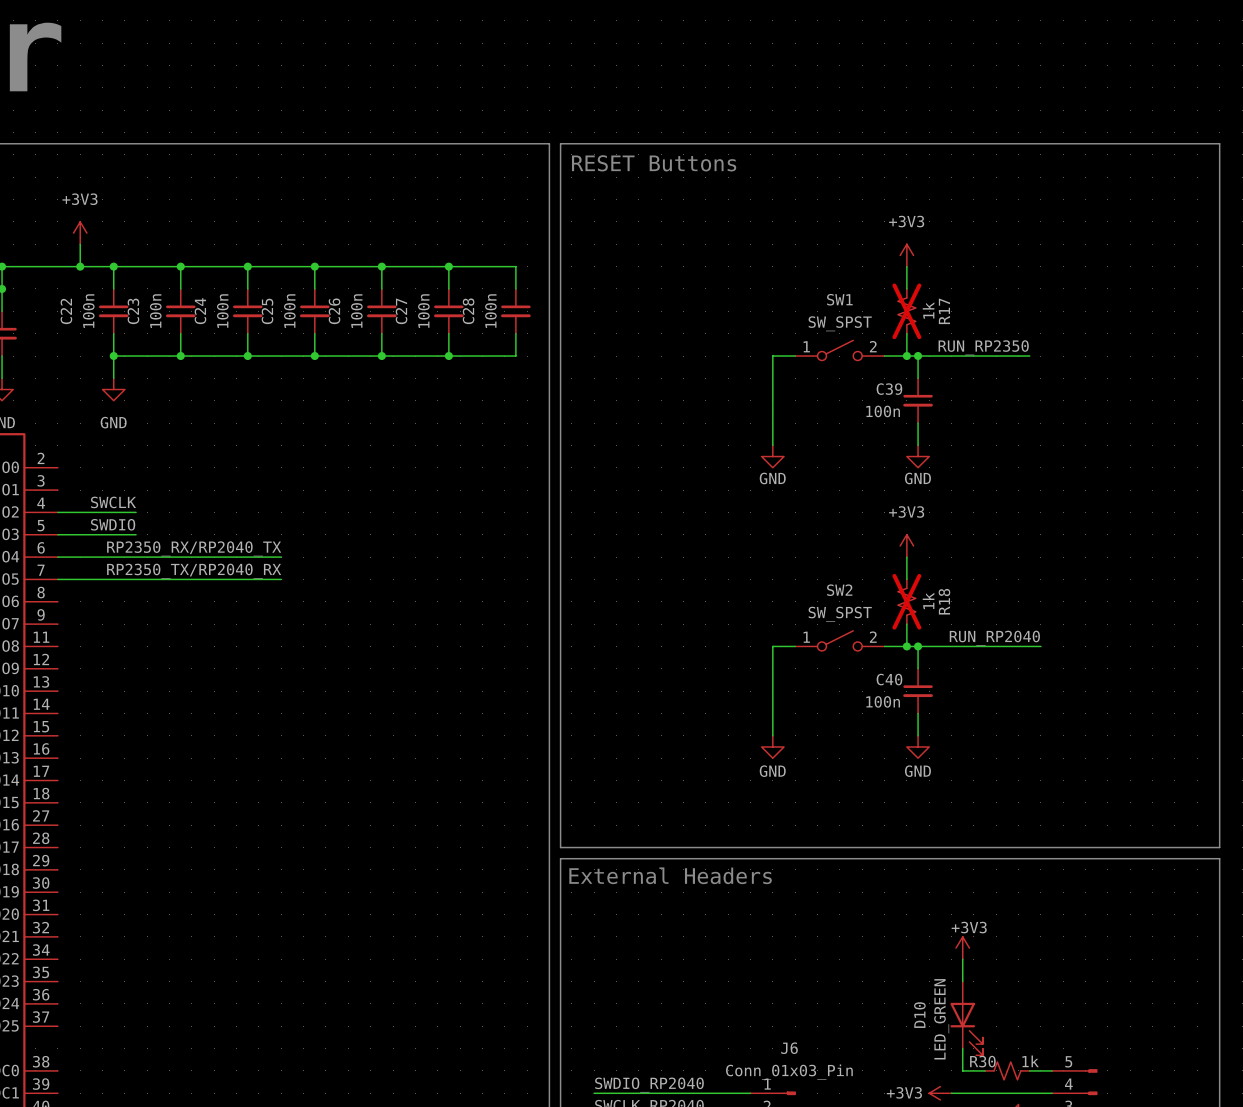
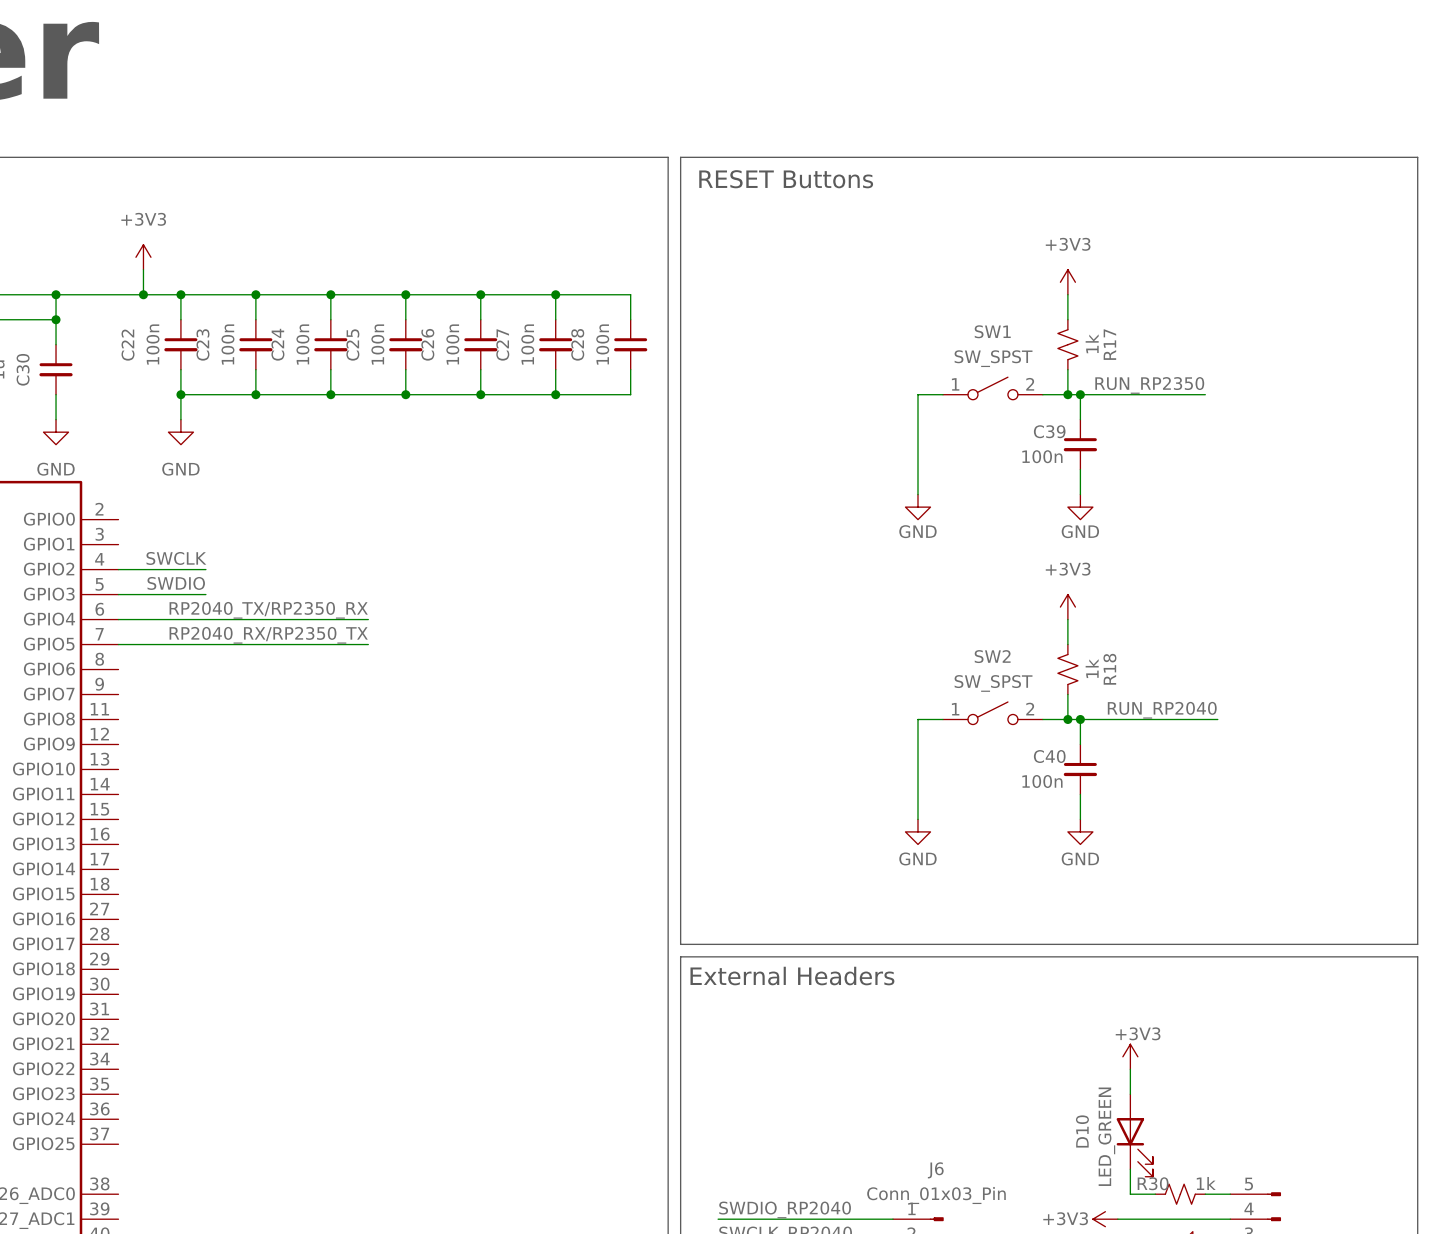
R17 do-not-place cross: (906, 311) -> none
label: RP2350_RX/RP2040_TX (194, 548) -> RP2040_TX/RP2350_RX (268, 610)
label: RP2350_TX/RP2040_RX (194, 571) -> RP2040_RX/RP2350_TX (268, 635)
R18 do-not-place cross: (906, 601) -> none

